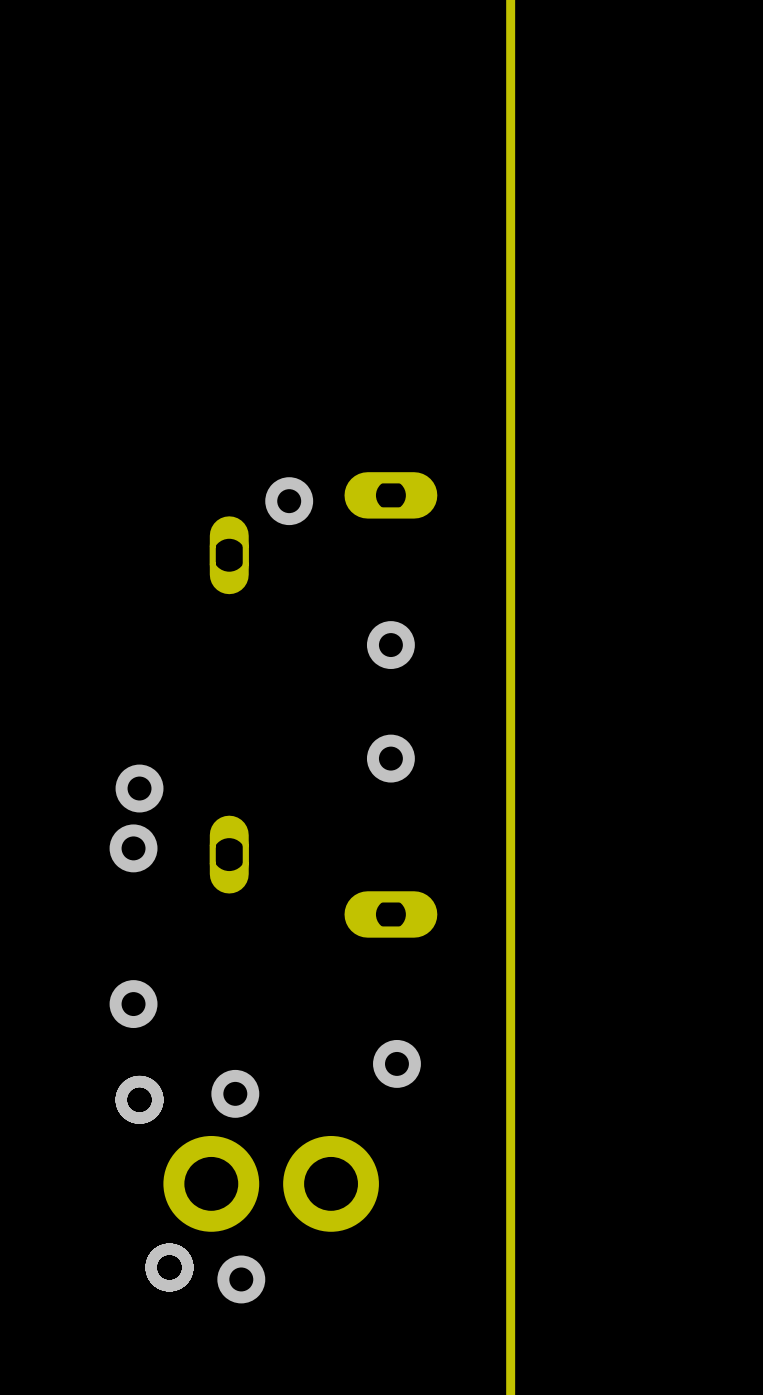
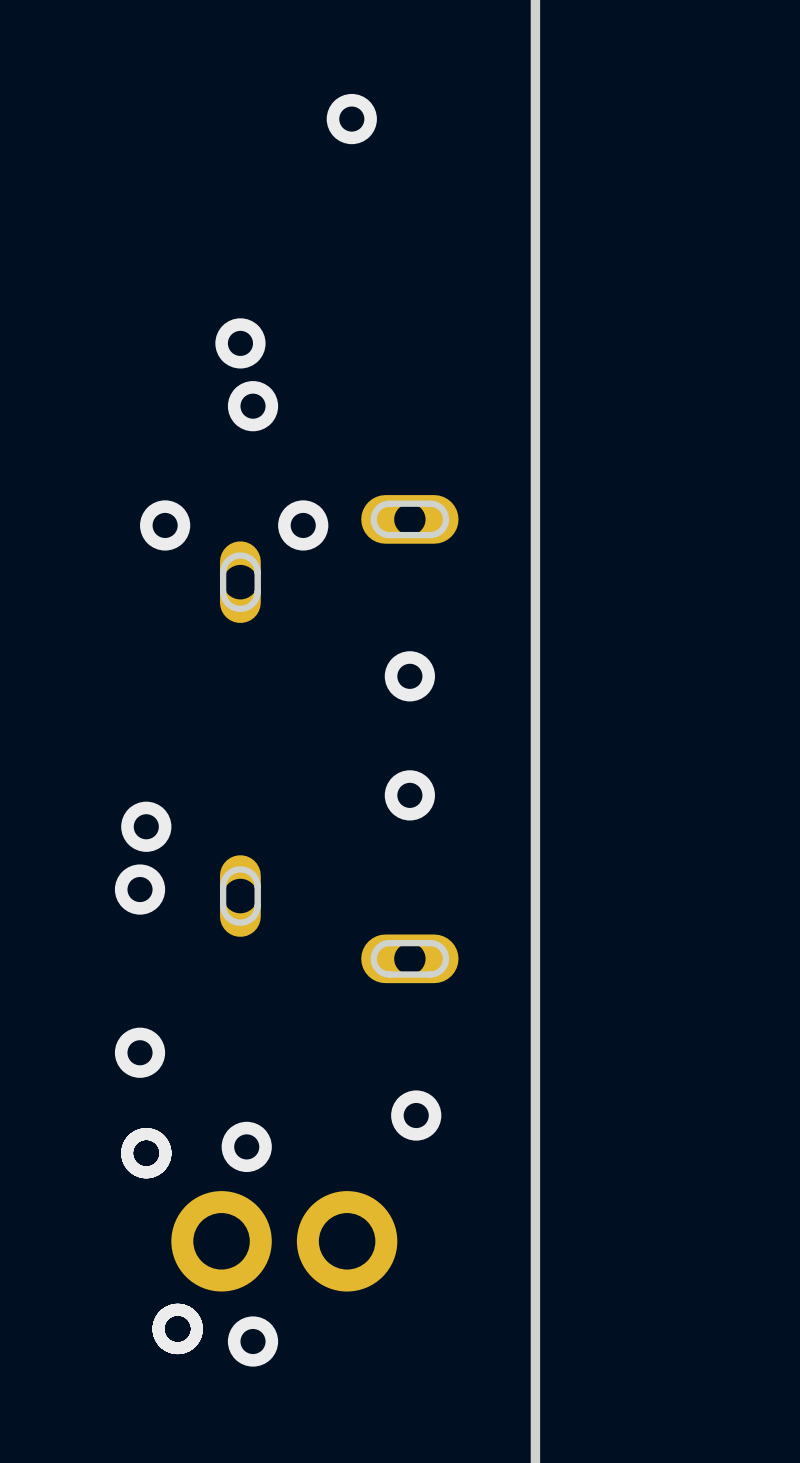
via: none -> (351, 119)
via: none -> (240, 343)
via: none -> (253, 406)
via: none -> (165, 525)

